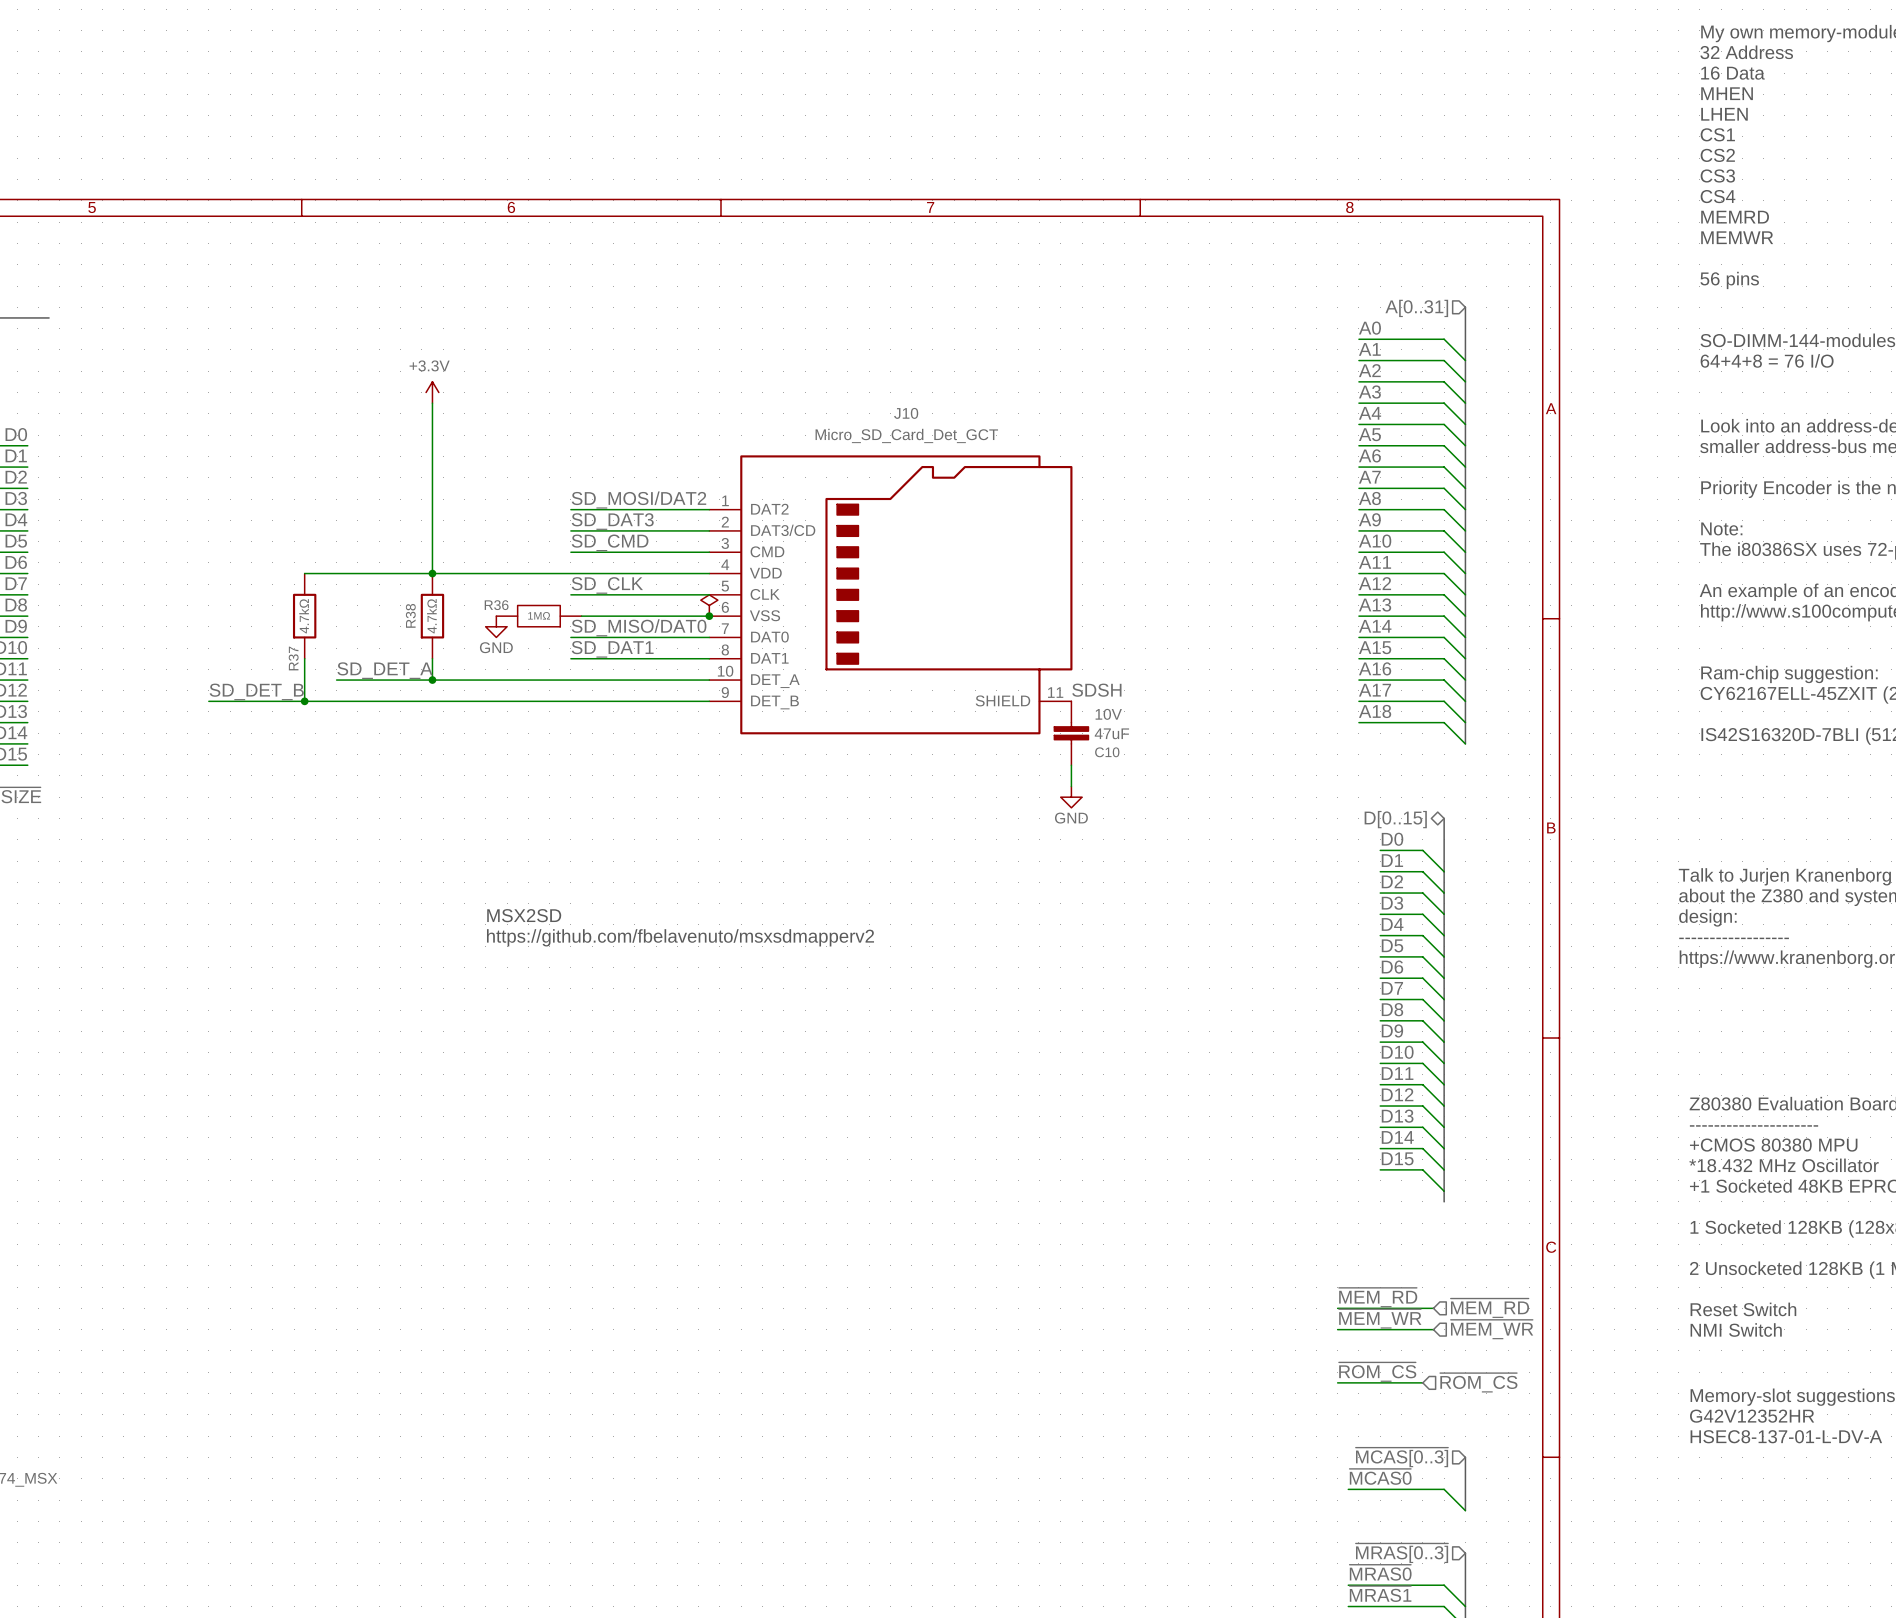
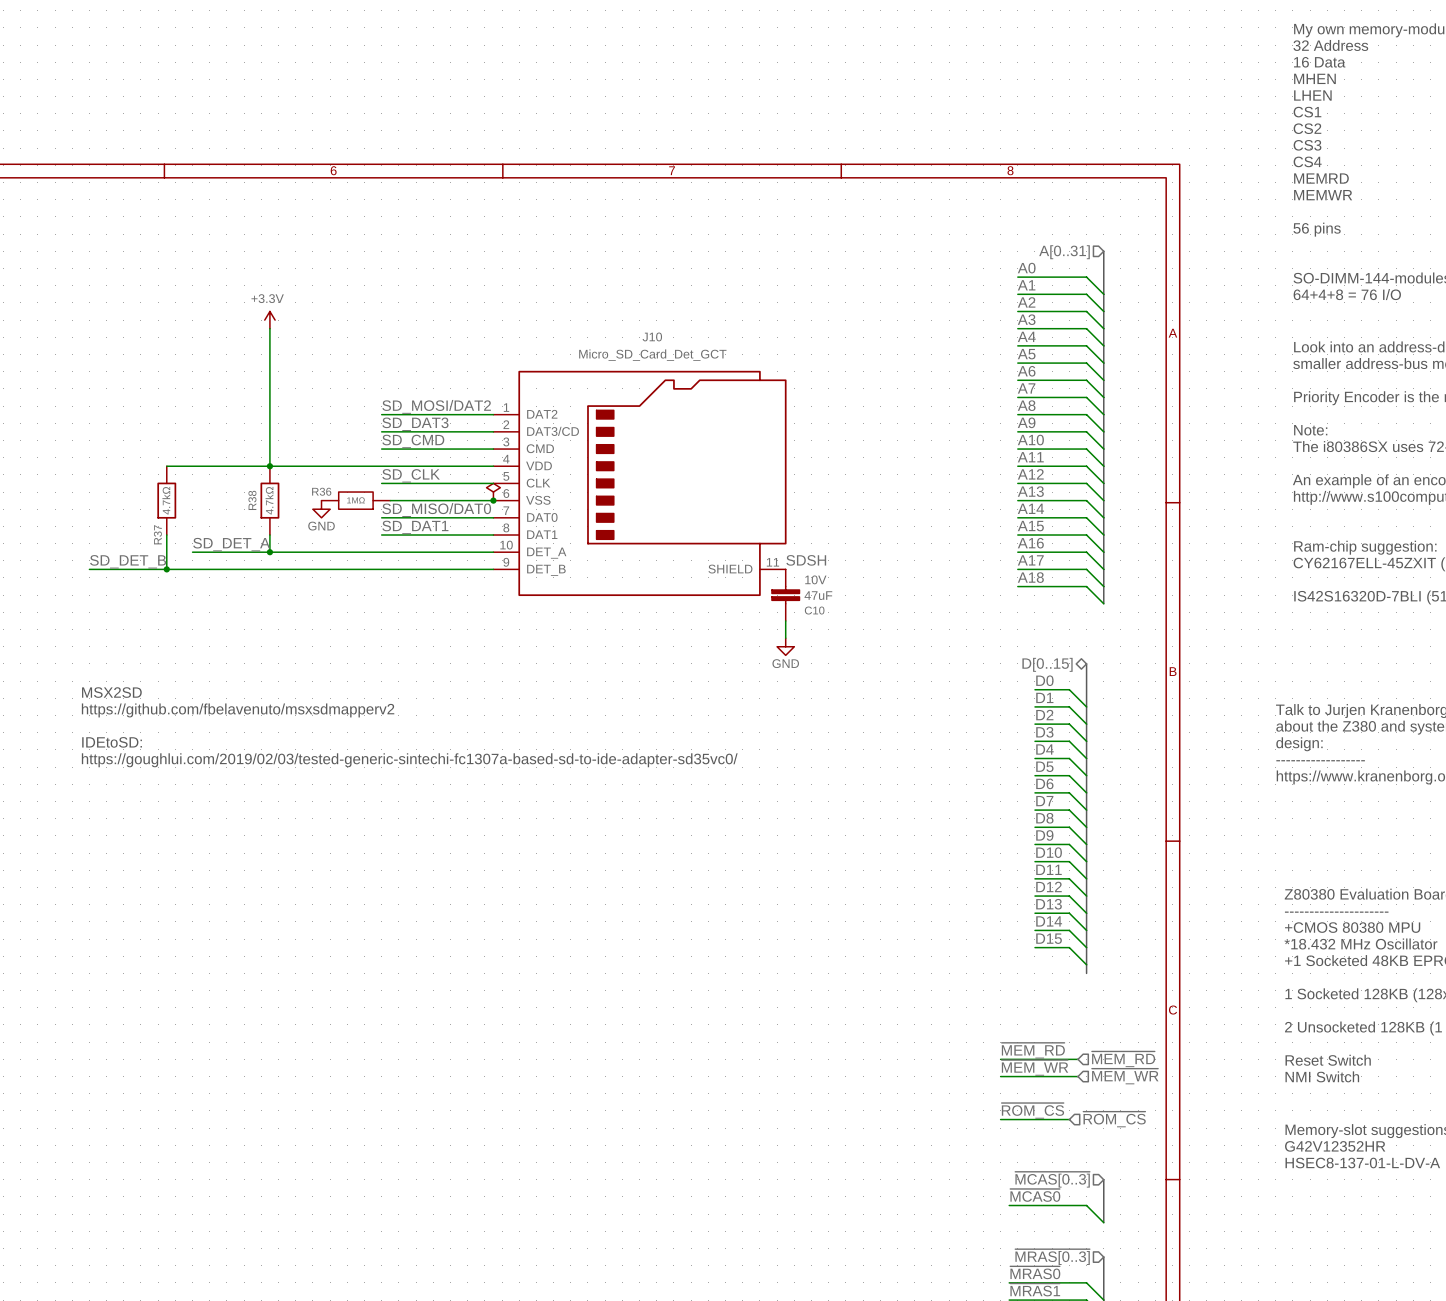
text: none -> MSX2SD (111, 692)
text: none -> https://github.com/fbelavenuto/msxsdmapperv2 (238, 710)
text: none -> IDEtoSD: (112, 742)
text: MSX2SD (524, 915) -> none
text: none -> https://goughlui.com/2019/02/03/tested-generic-sintechi-fc1307a-based-sd-to-ide-adapter-sd35vc0/ (409, 760)
text: https://github.com/fbelavenuto/msxsdmapperv2 (680, 937) -> none

